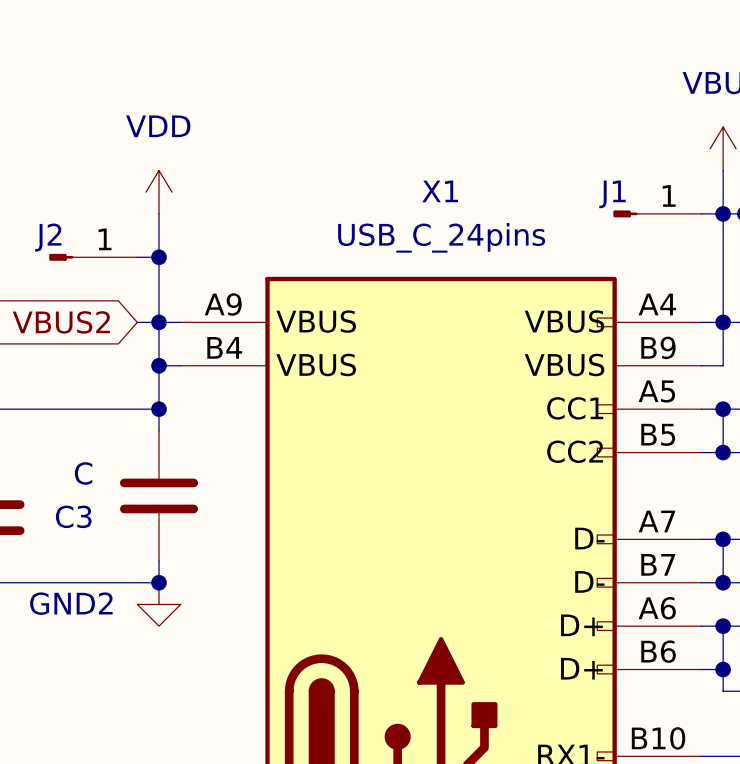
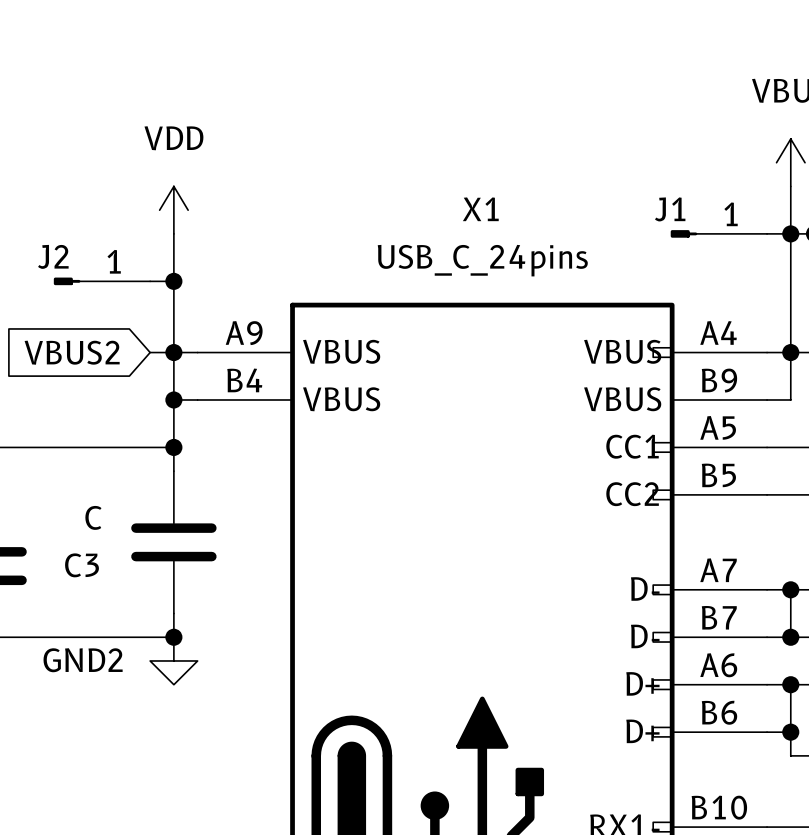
wire: (723, 409) (723, 452) -> none
junction: (723, 409) -> none
junction: (723, 452) -> none

